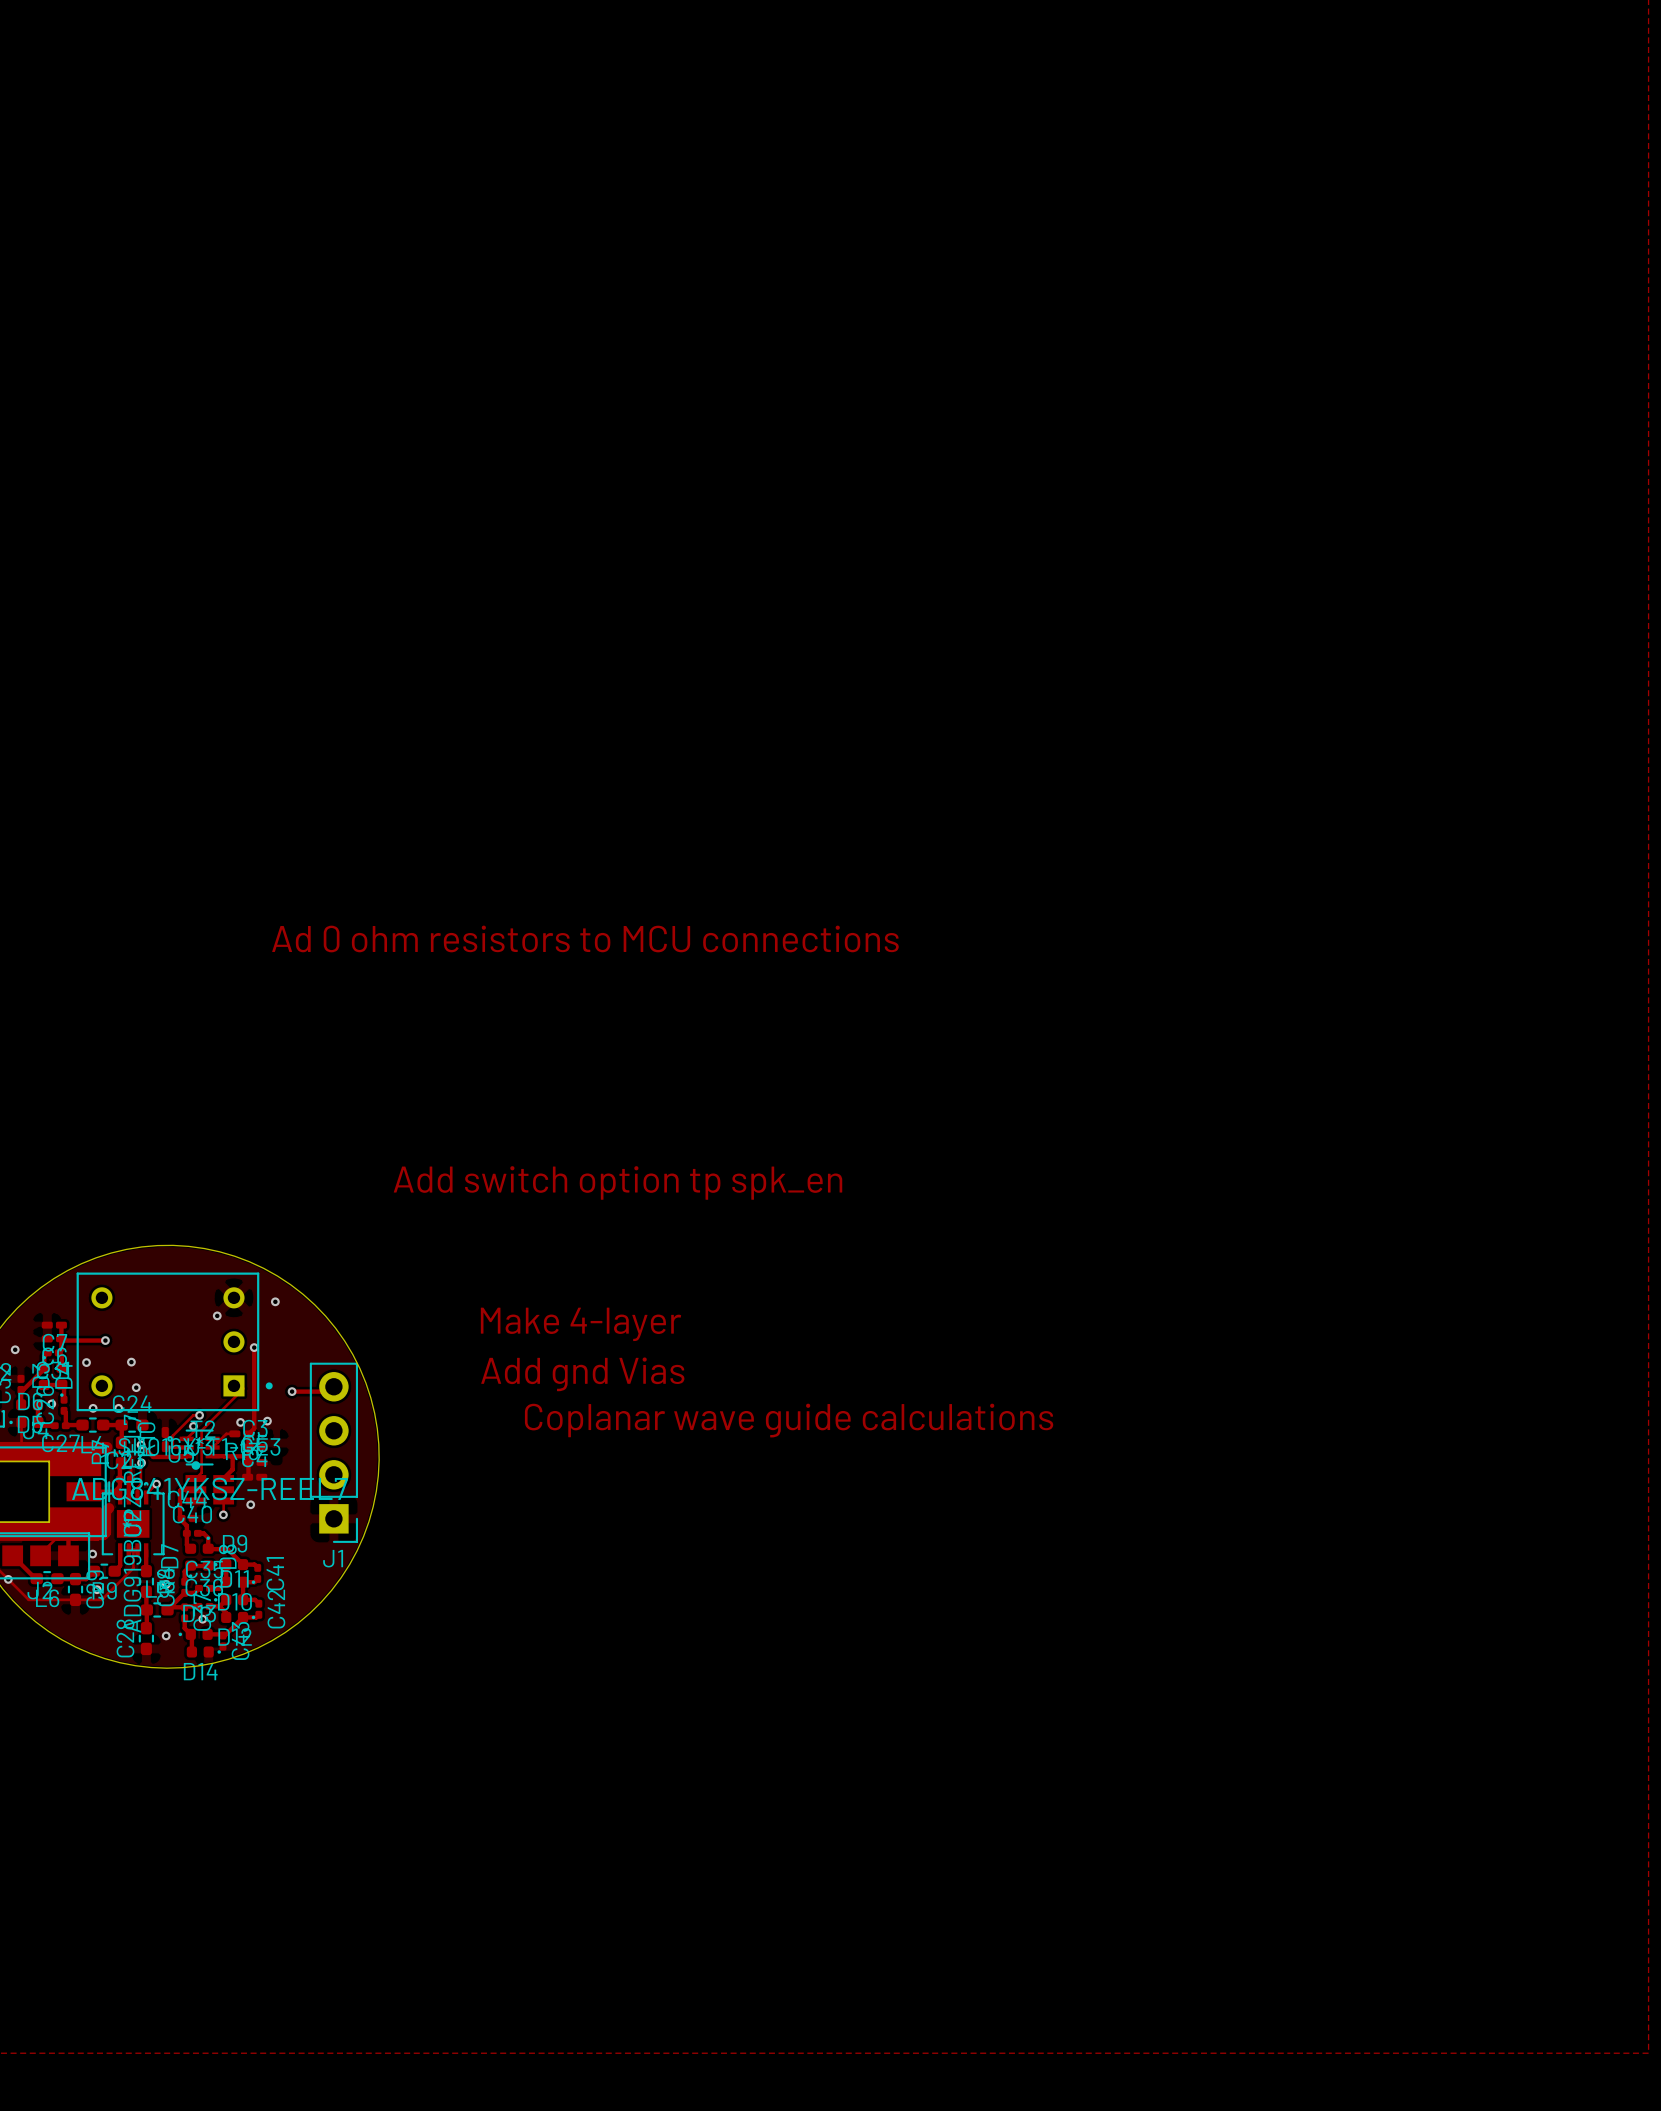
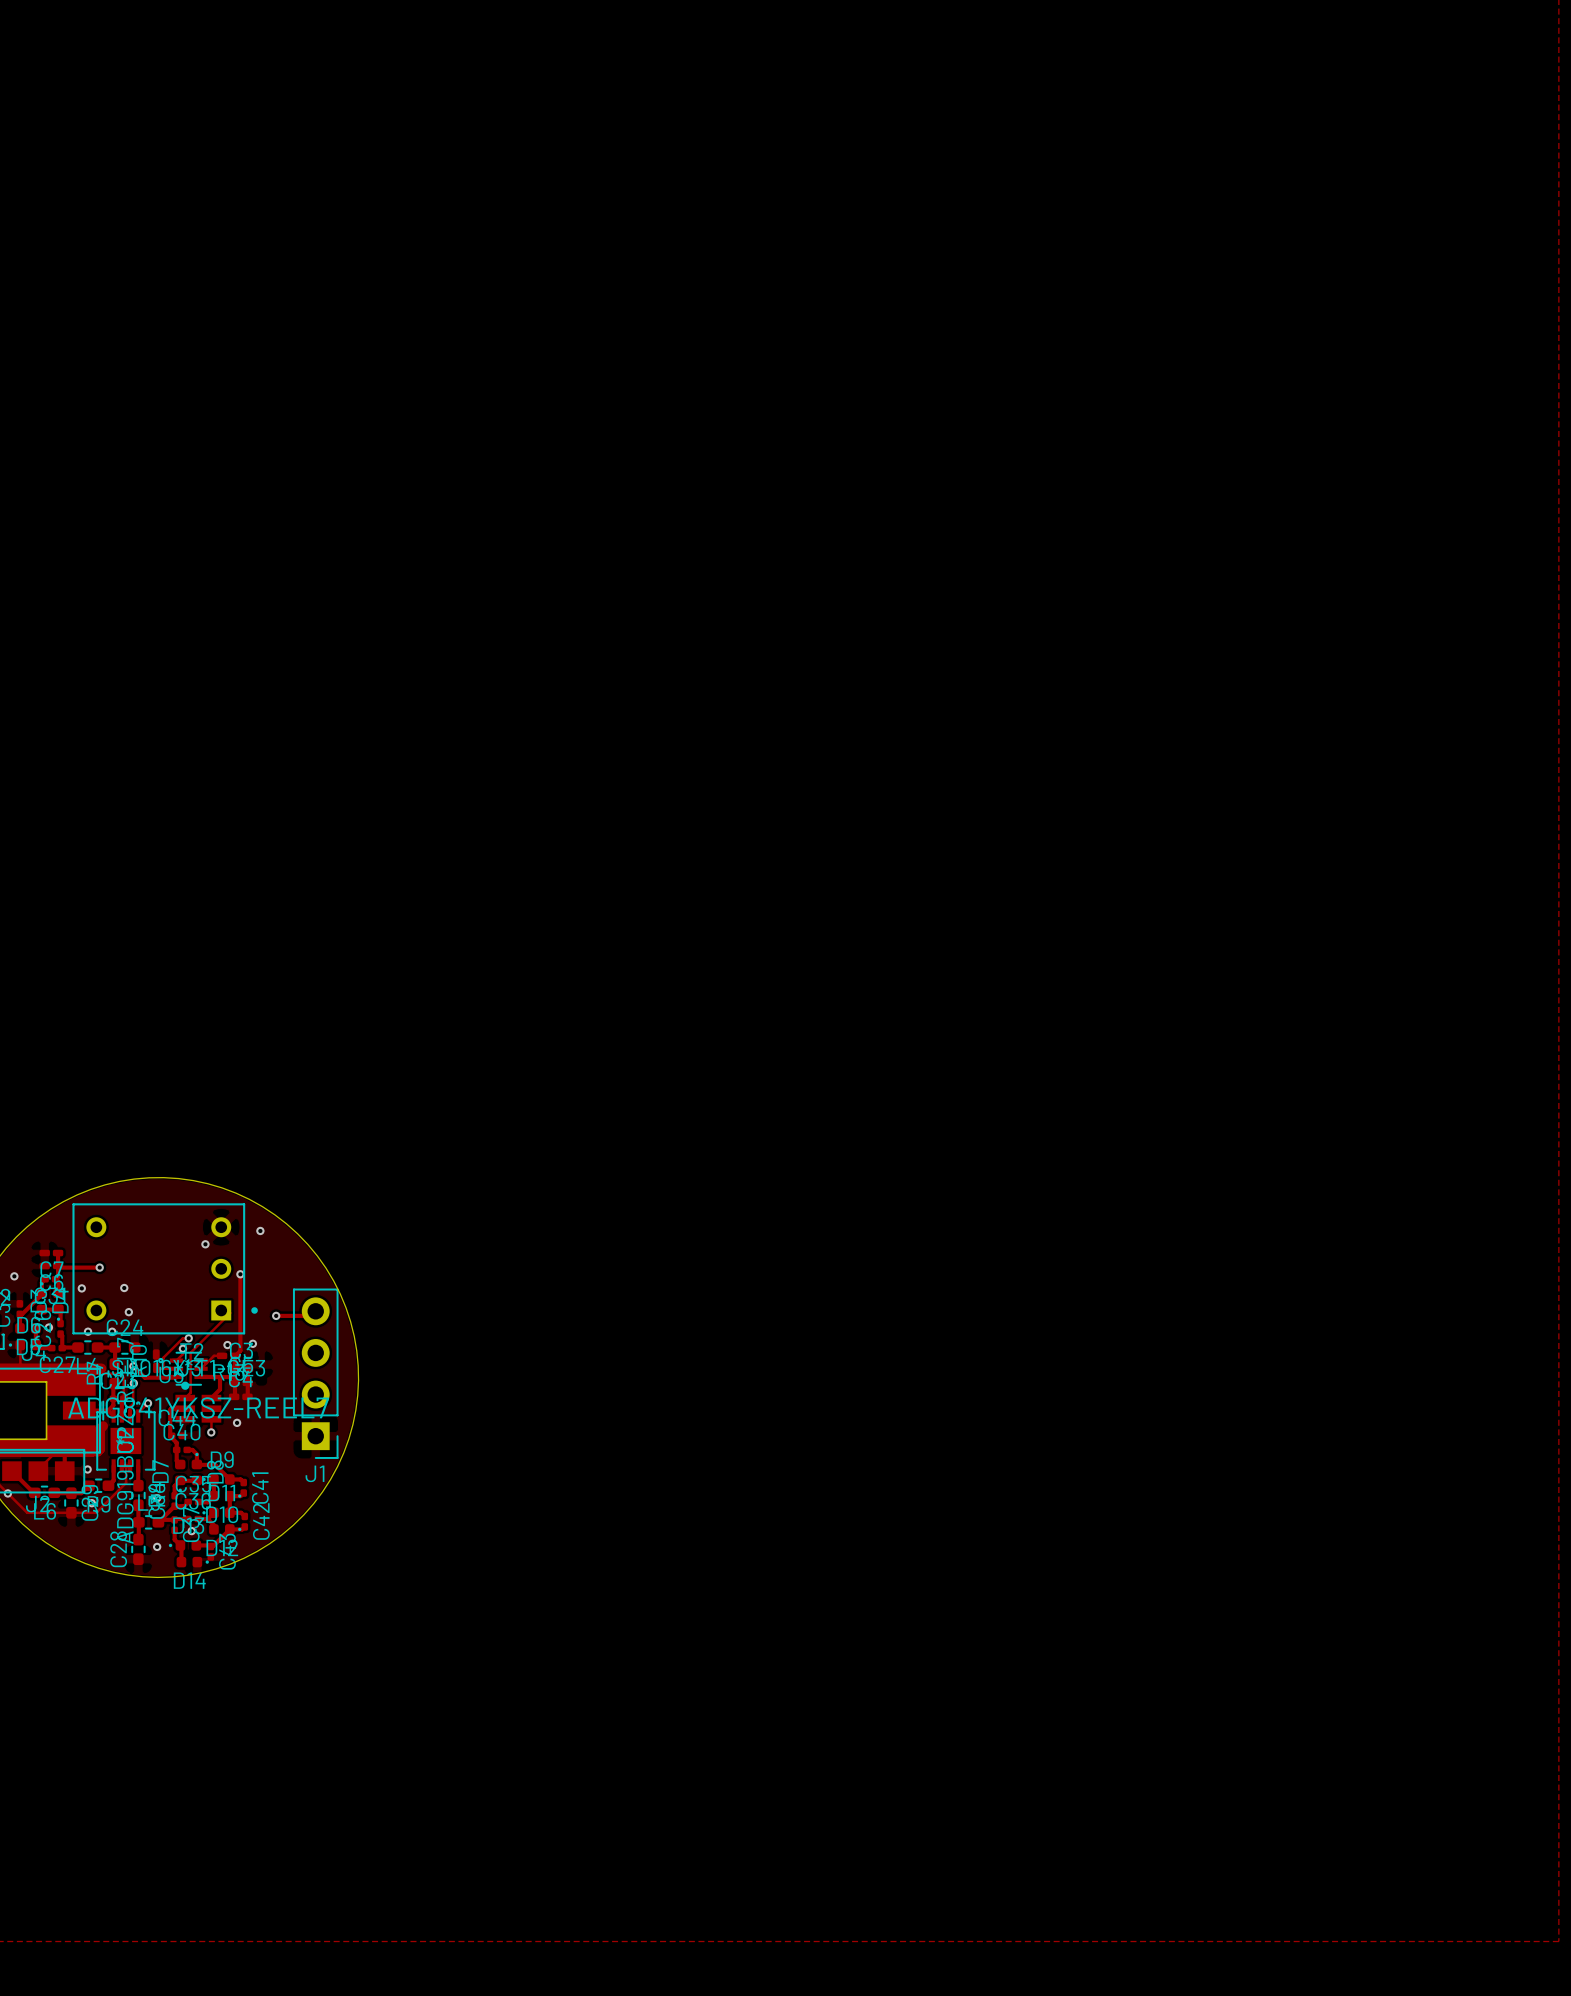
text: Ad 0 ohm resistors to MCU connections (585, 938) -> none
text: Add switch option tp spk_en (617, 1182) -> none
text: Make 4-layer (581, 1324) -> none
text: Add gnd Vias (582, 1374) -> none
text: Coplanar wave guide calculations (789, 1420) -> none
track: none -> (248, 1368) (247, 1396)

